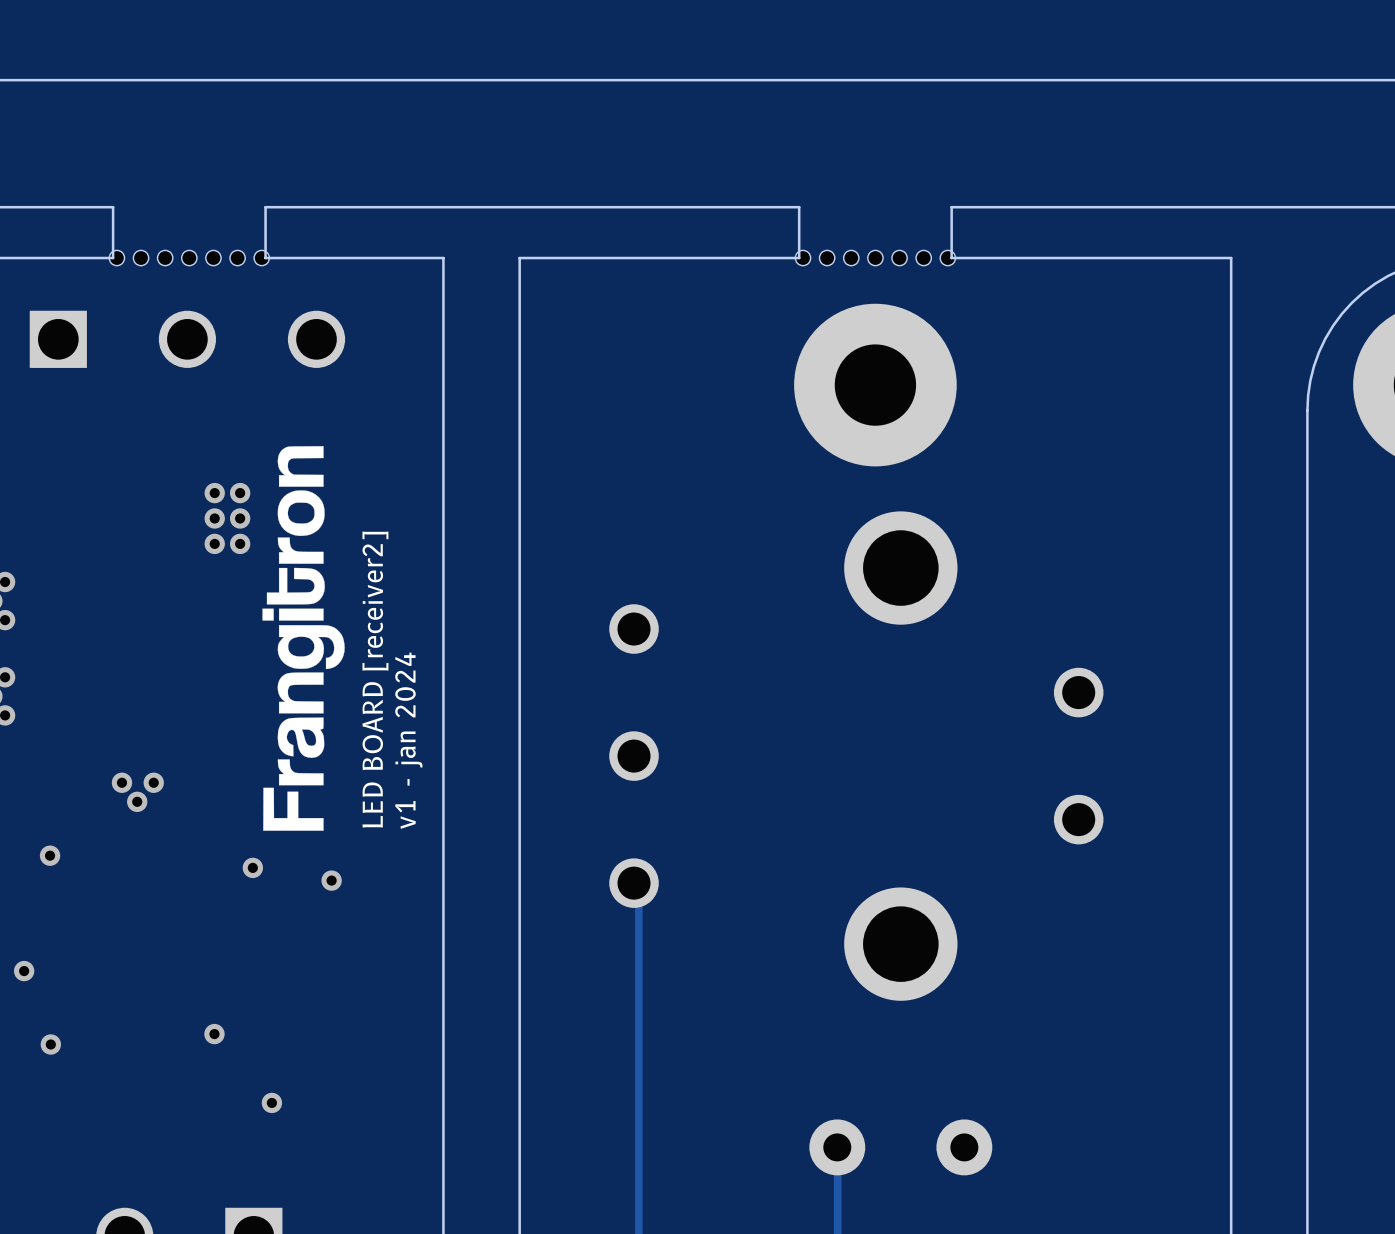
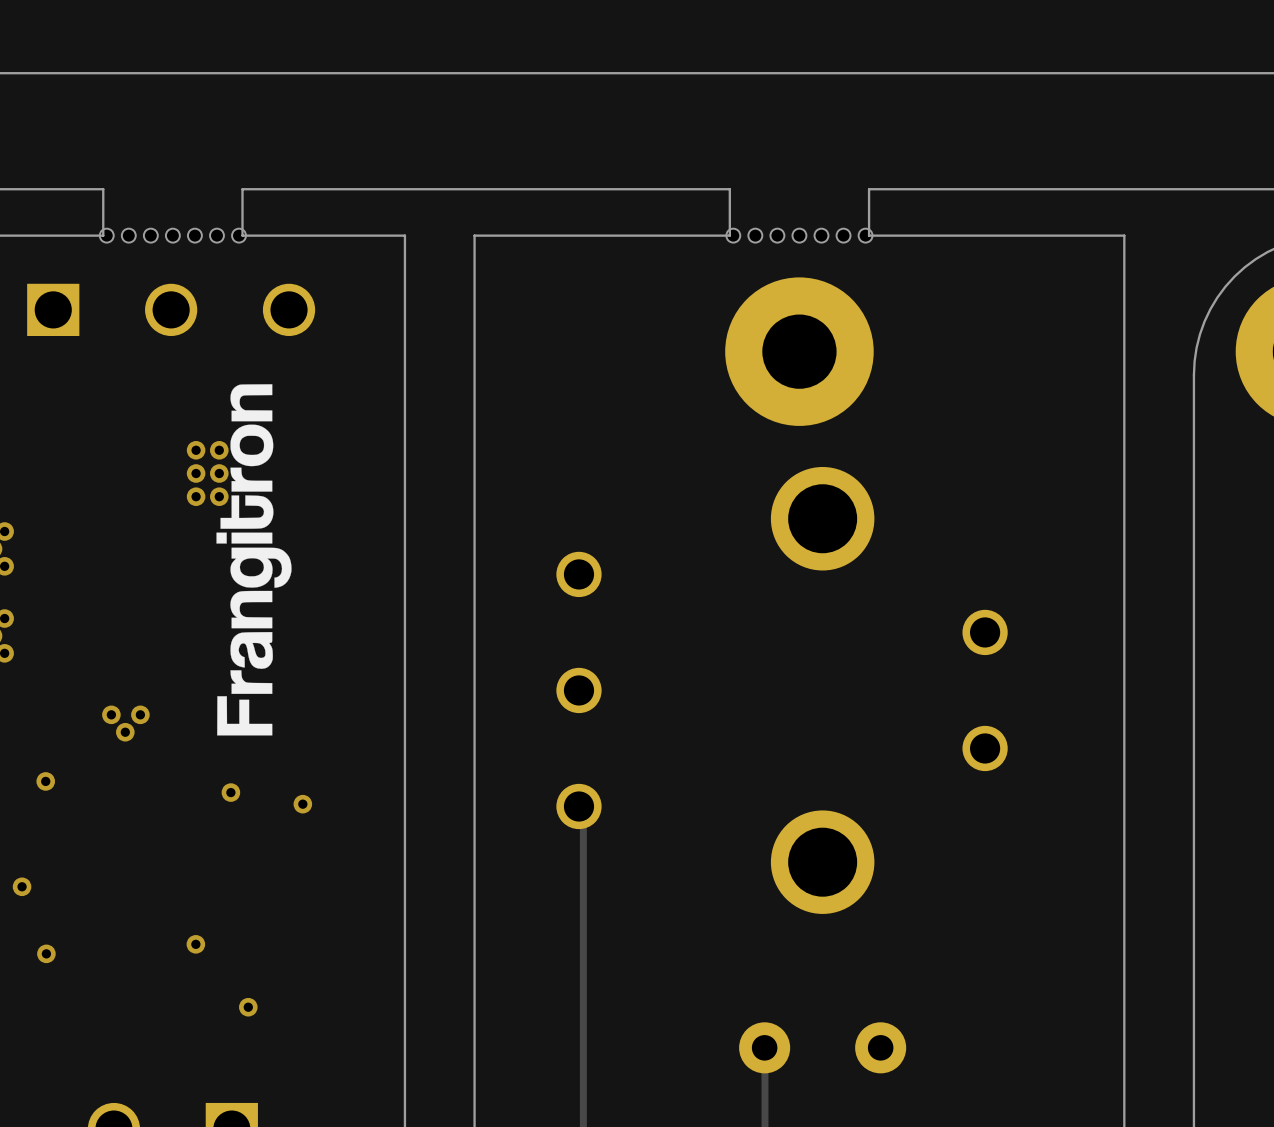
drawing position: (303, 638) -> (254, 559)
text: LED BOARD [receiver2] (375, 679) -> none
text: v1 - jan 2024 (408, 740) -> none

